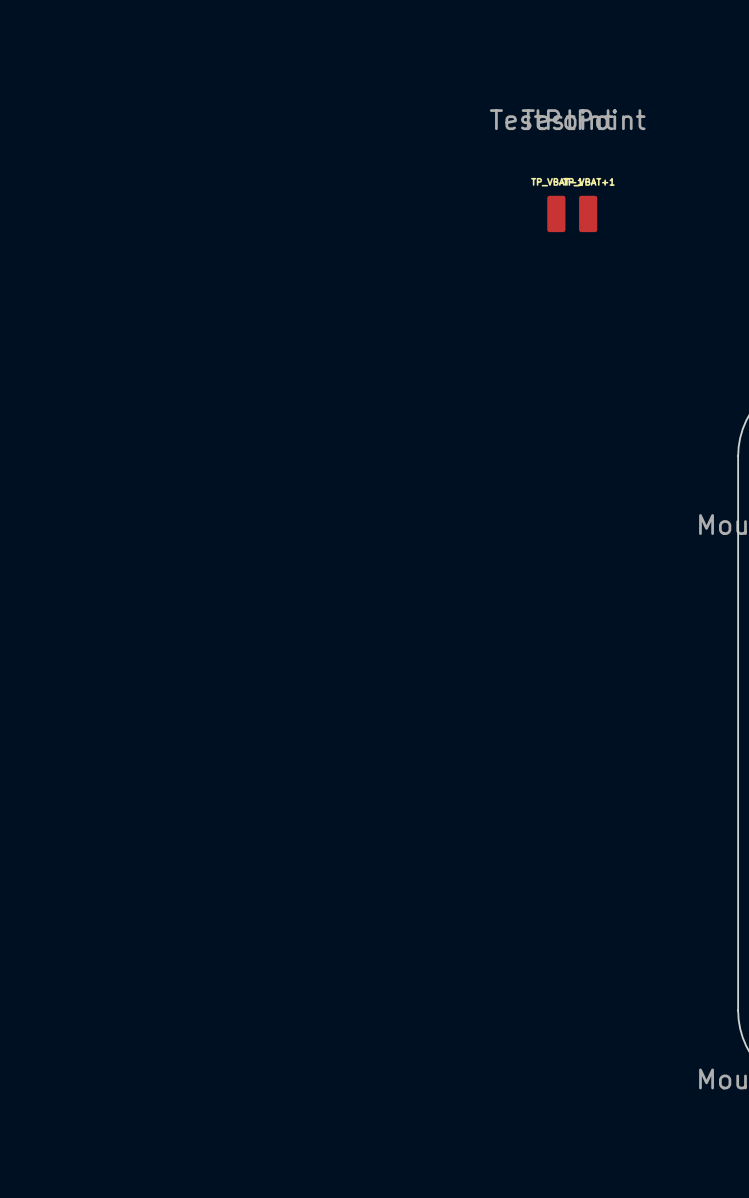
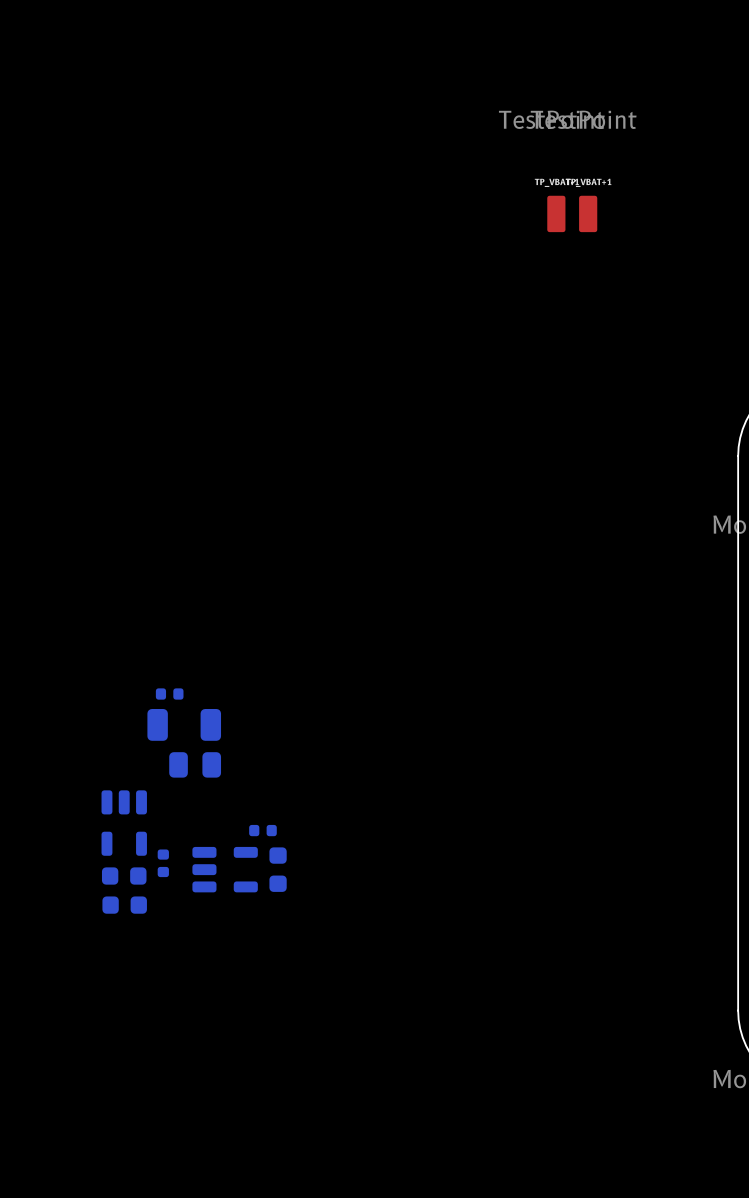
part: none -> (169, 694)
part: none -> (184, 724)
part: none -> (195, 764)
part: none -> (124, 823)
part: none -> (262, 830)
part: none -> (163, 863)
part: none -> (225, 869)
part: none -> (278, 869)
part: none -> (124, 876)
part: none -> (124, 905)

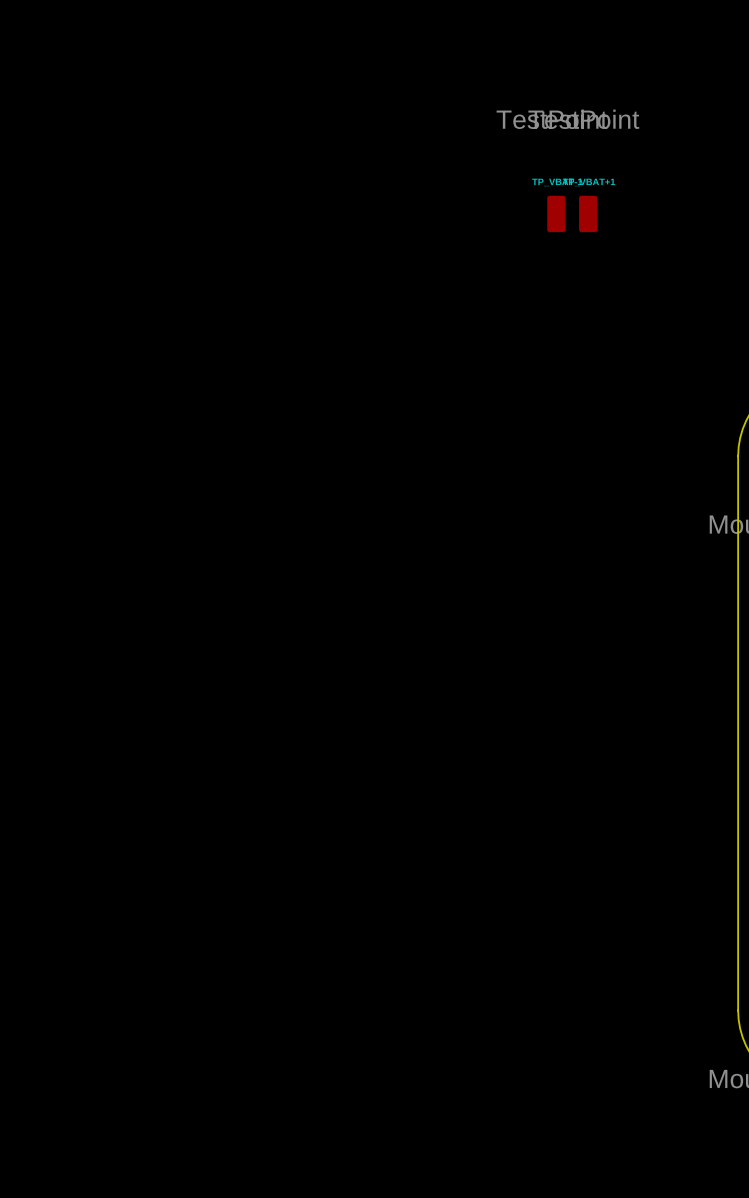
part: (169, 694) -> none
part: (184, 724) -> none
part: (195, 764) -> none
part: (124, 823) -> none
part: (262, 830) -> none
part: (163, 863) -> none
part: (225, 869) -> none
part: (278, 869) -> none
part: (124, 876) -> none
part: (124, 905) -> none

